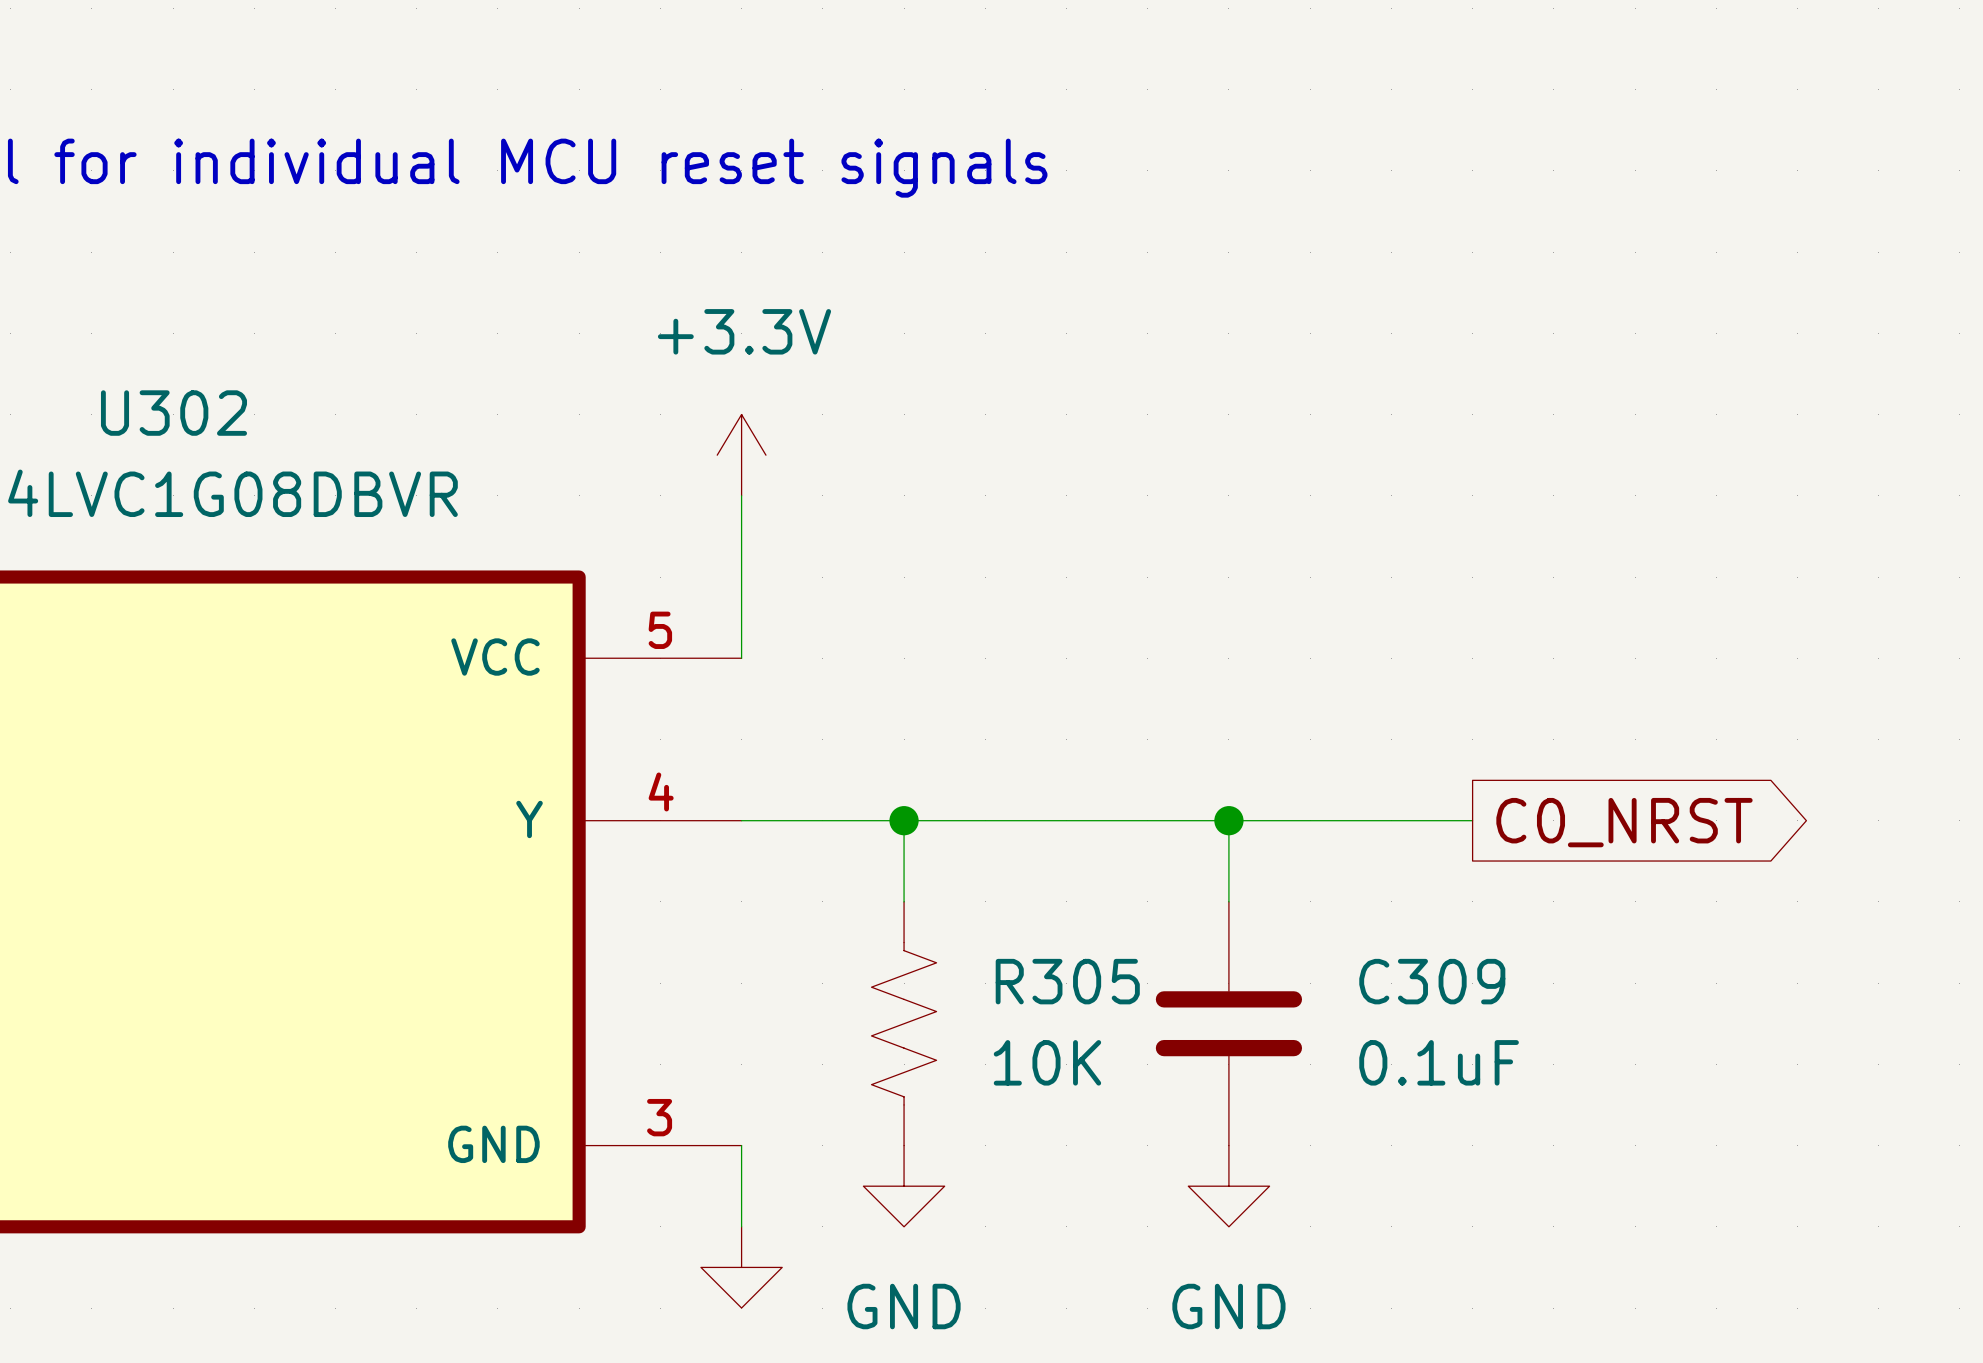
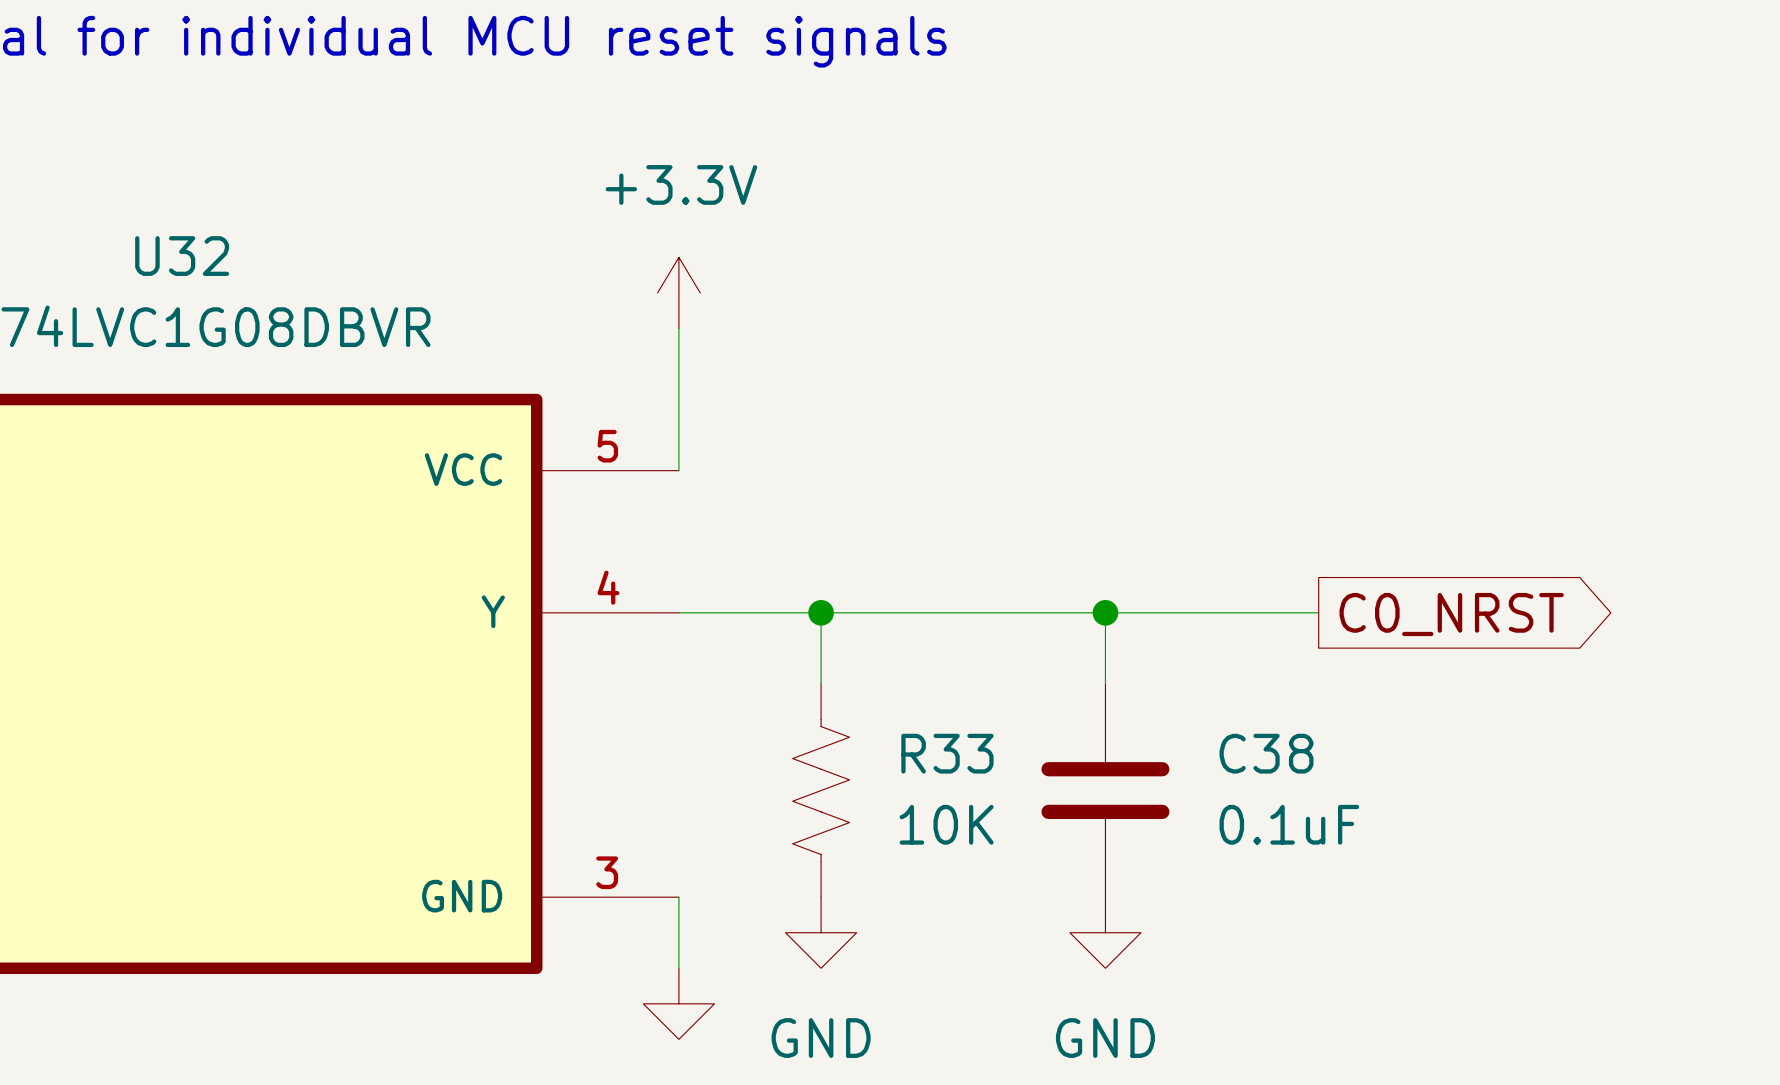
U302 name: U302 (173, 413) -> U32 (182, 256)
R305 name: R305 (1067, 981) -> R33 (947, 753)
C309 name: C309 (1432, 981) -> C38 (1266, 753)

